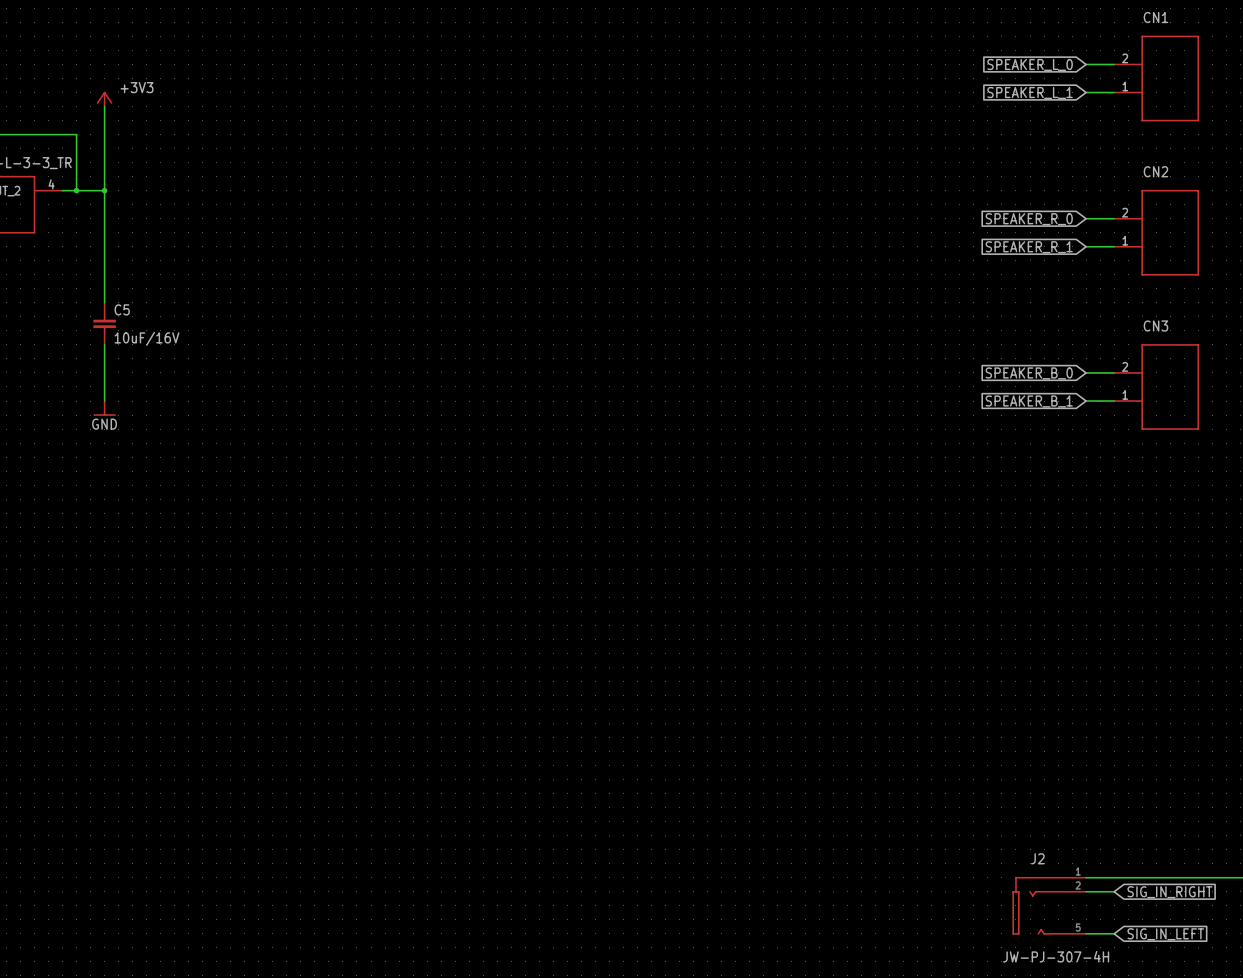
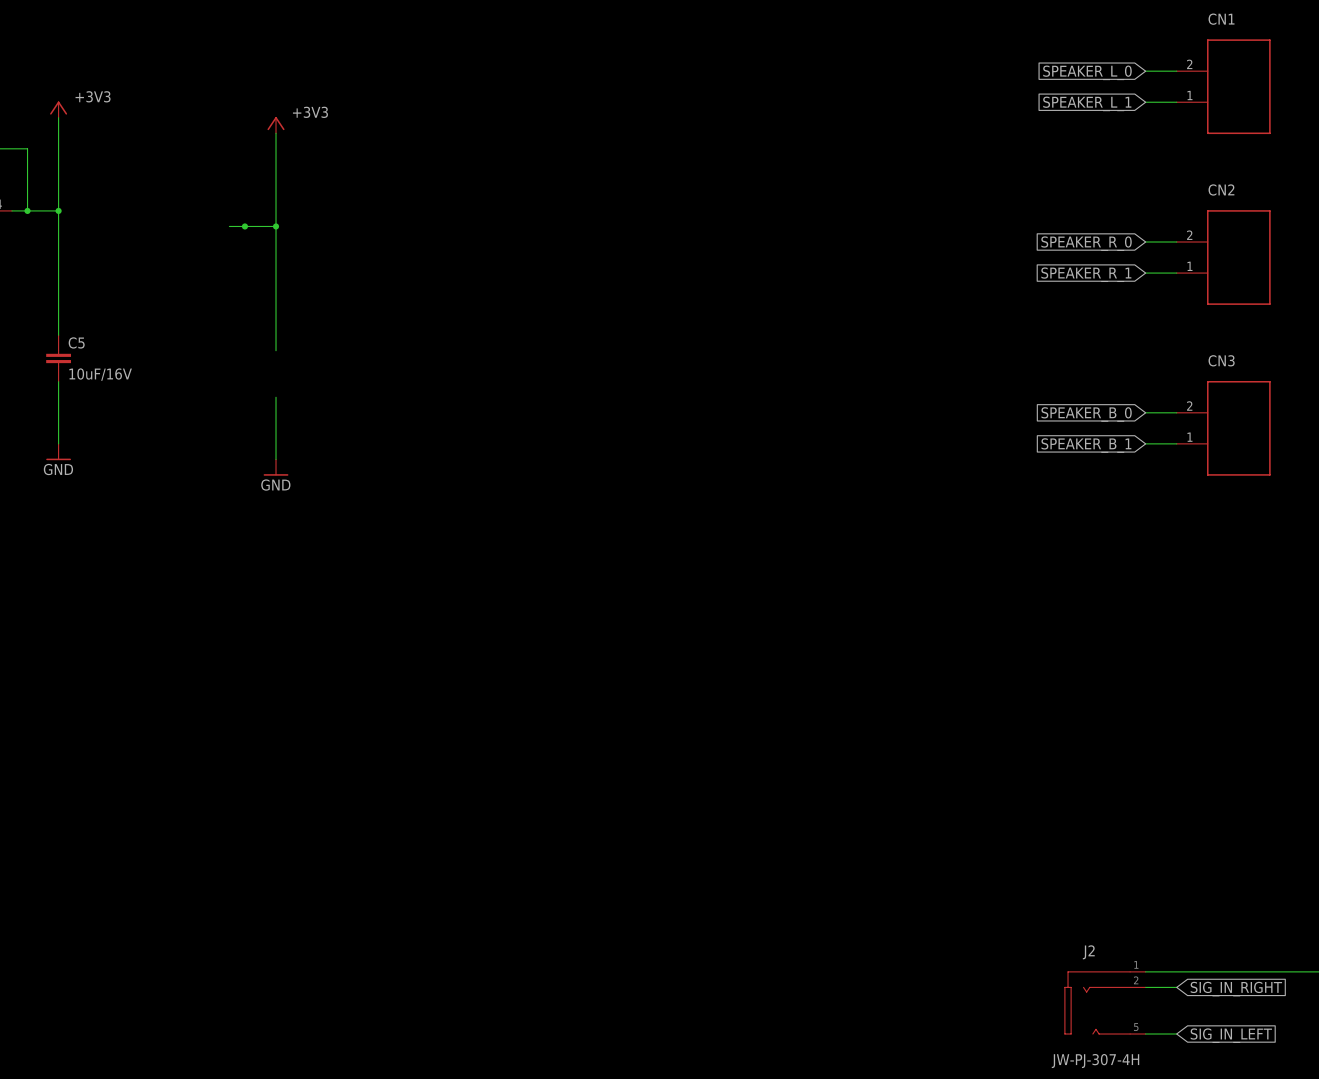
power symbol: none -> +3V3 (276, 125)
wire: none -> (276, 133) (276, 350)
wire: none -> (229, 226) (276, 226)
junction: none -> (244, 226)
junction: none -> (276, 226)
wire: none -> (276, 397) (276, 459)
power symbol: none -> GND (276, 467)

